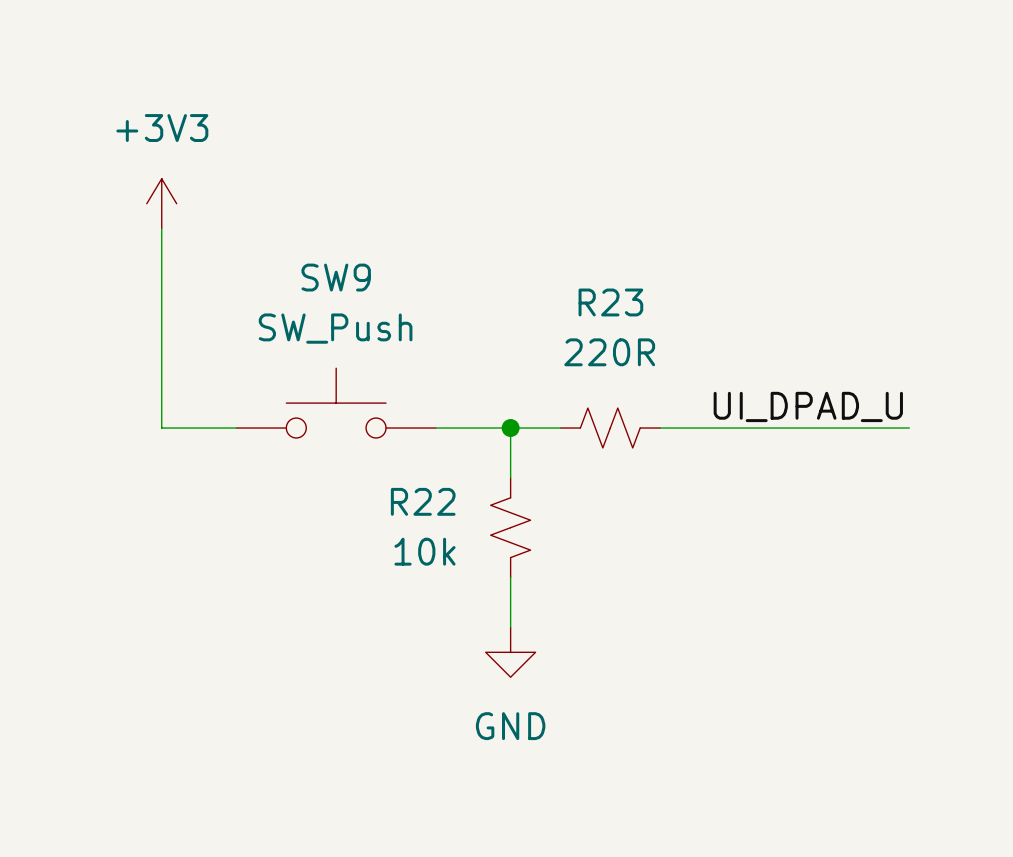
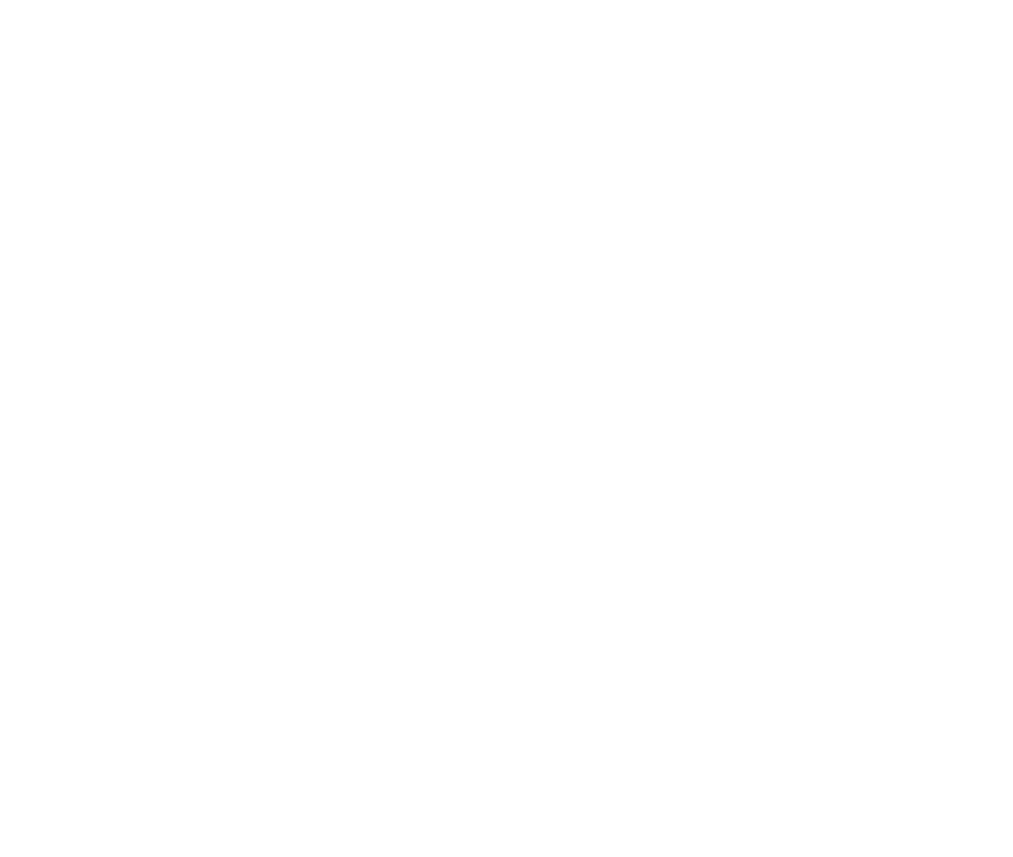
power symbol: +3V3 (161, 203) -> none
wire: (161, 228) (161, 428) (236, 428) -> none
SW9: SW_Push (336, 403) -> none
label: UI_DPAD_U (808, 406) -> none
wire: (435, 428) (560, 428) -> none
wire: (510, 428) (510, 477) -> none
junction: (510, 428) -> none
R23: 220R (610, 428) -> none
wire: (660, 428) (909, 428) -> none
R22: 10k (510, 527) -> none
wire: (510, 577) (510, 627) -> none
power symbol: GND (510, 652) -> none

